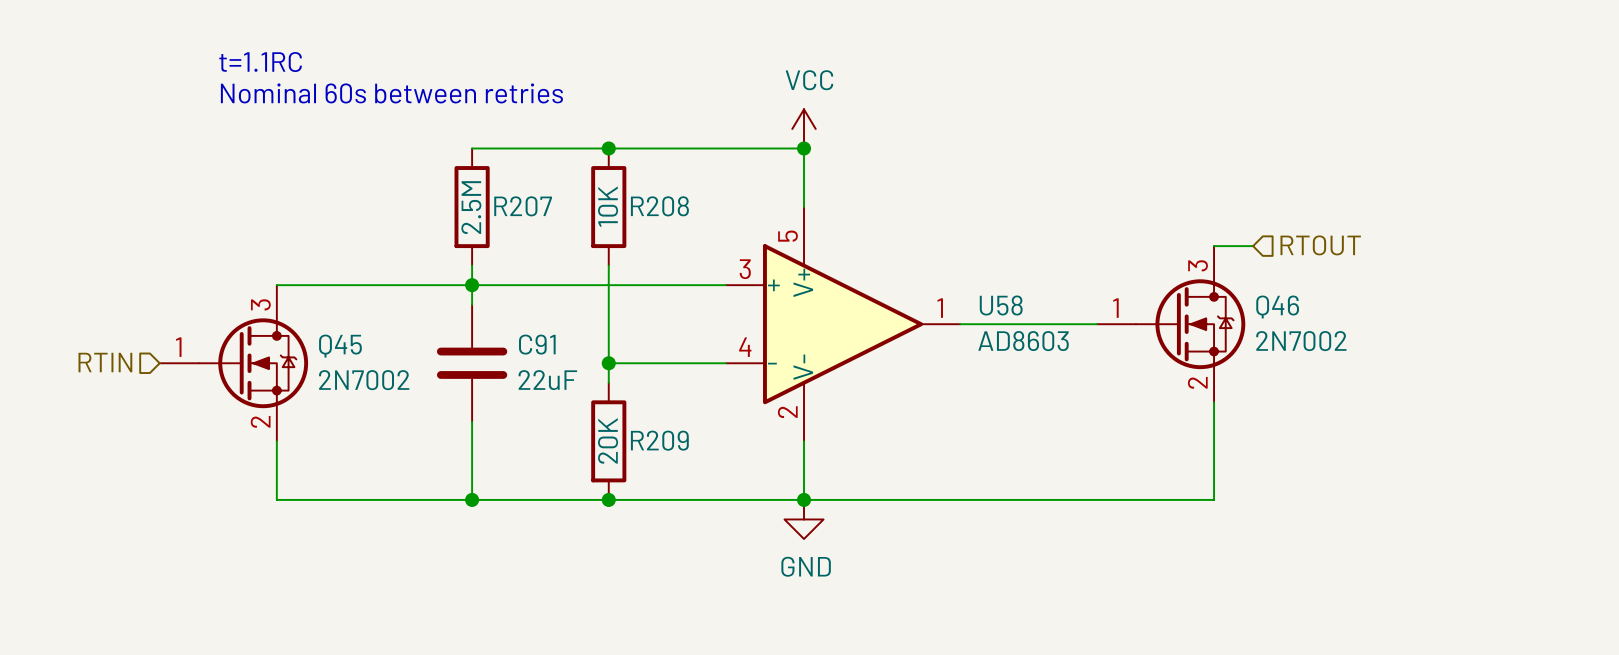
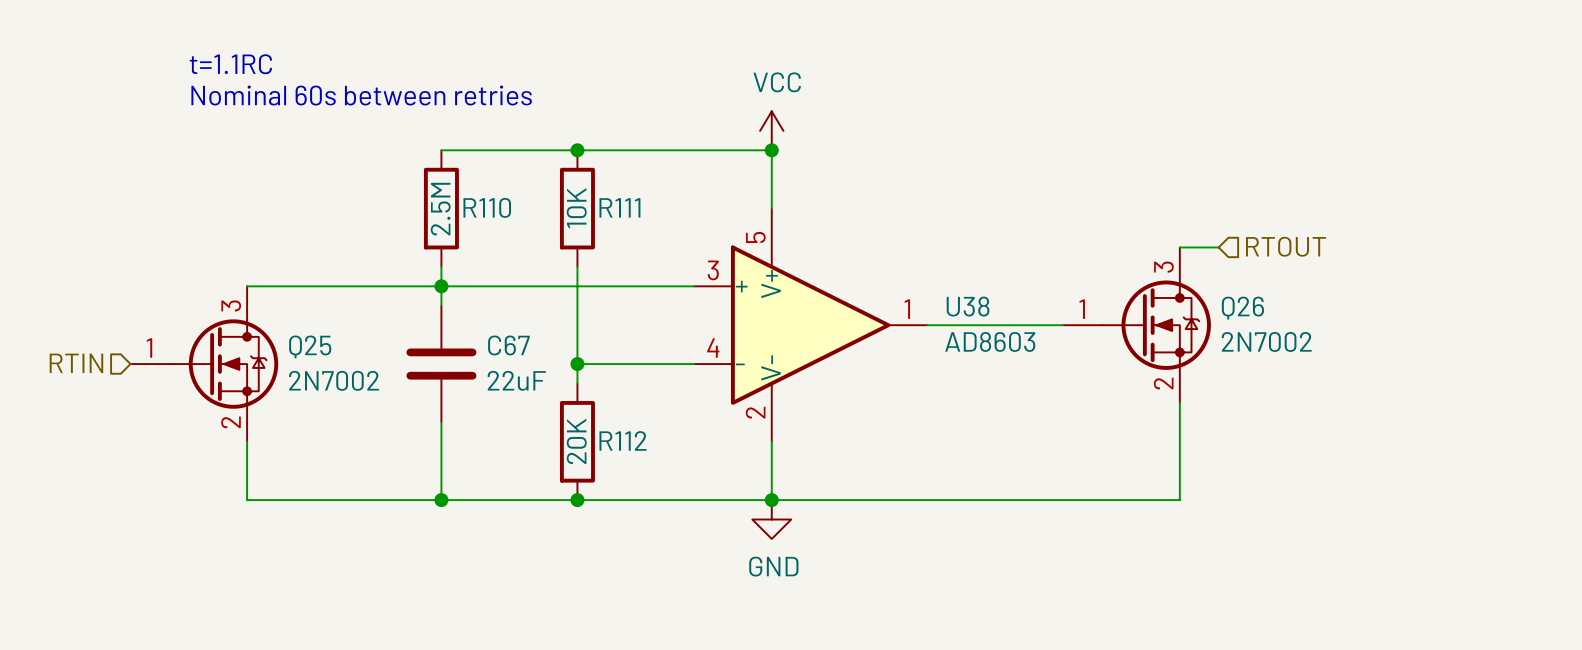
R207 name: R207 (523, 206) -> R110 (487, 207)
R208 name: R208 (659, 206) -> R111 (619, 207)
U58 name: U58 (1001, 305) -> U38 (968, 306)
Q46 name: Q46 (1277, 307) -> Q26 (1242, 308)
C91 name: C91 (537, 344) -> C67 (508, 345)
Q45 name: Q45 (340, 346) -> Q25 (310, 346)
R209 name: R209 (659, 440) -> R112 (623, 440)

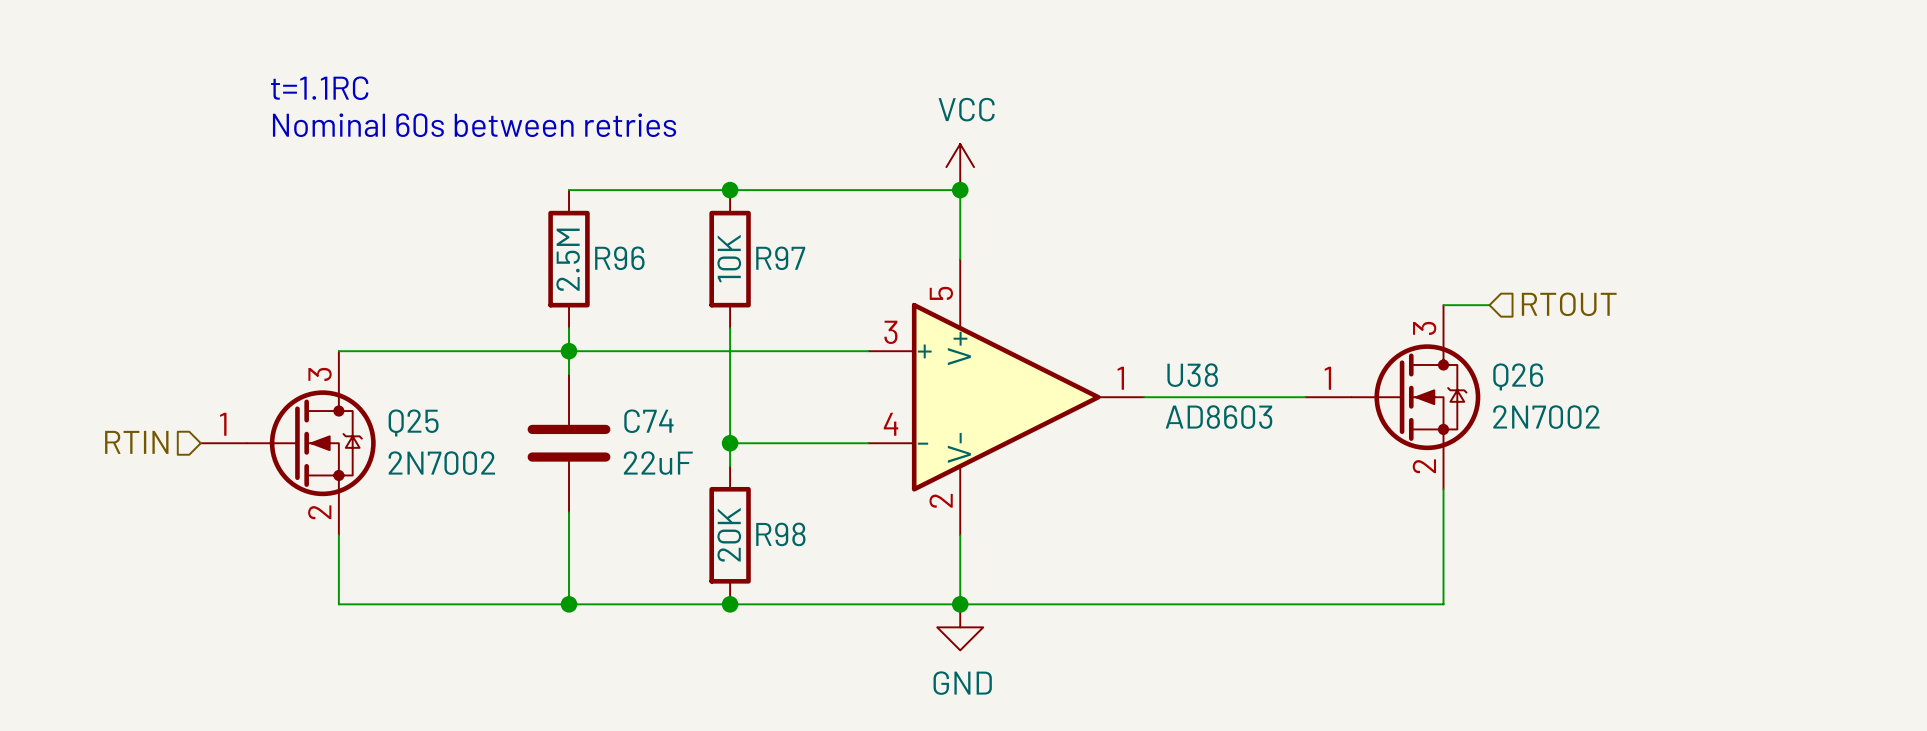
R110 name: R110 (487, 207) -> R96 (619, 258)
R111 name: R111 (619, 207) -> R97 (780, 258)
C67 name: C67 (508, 345) -> C74 (648, 421)
R112 name: R112 (623, 440) -> R98 (780, 534)

